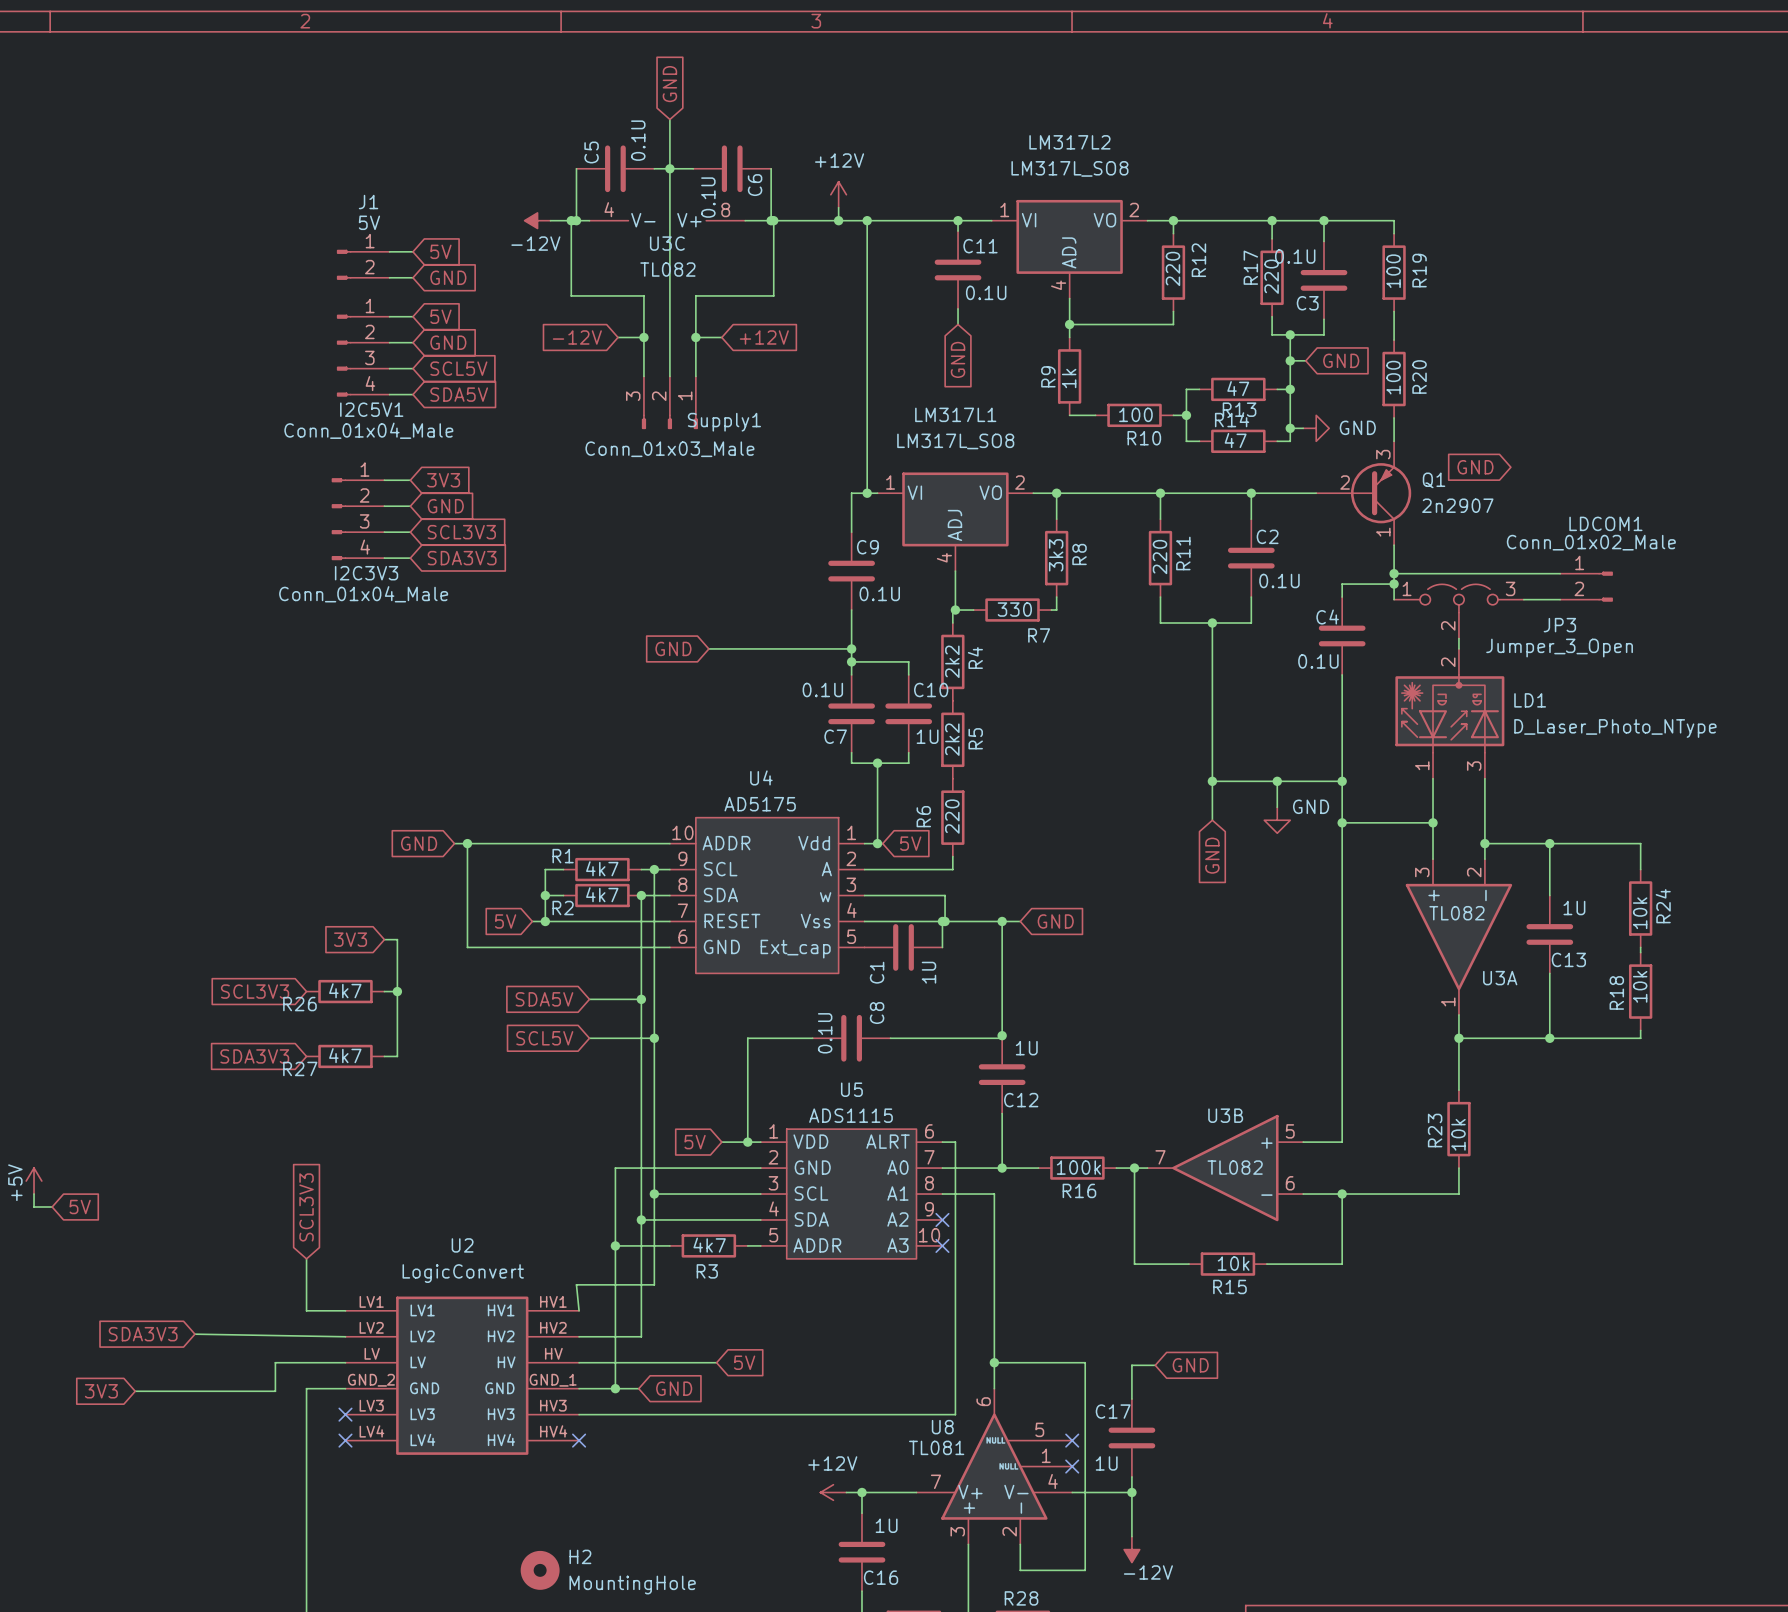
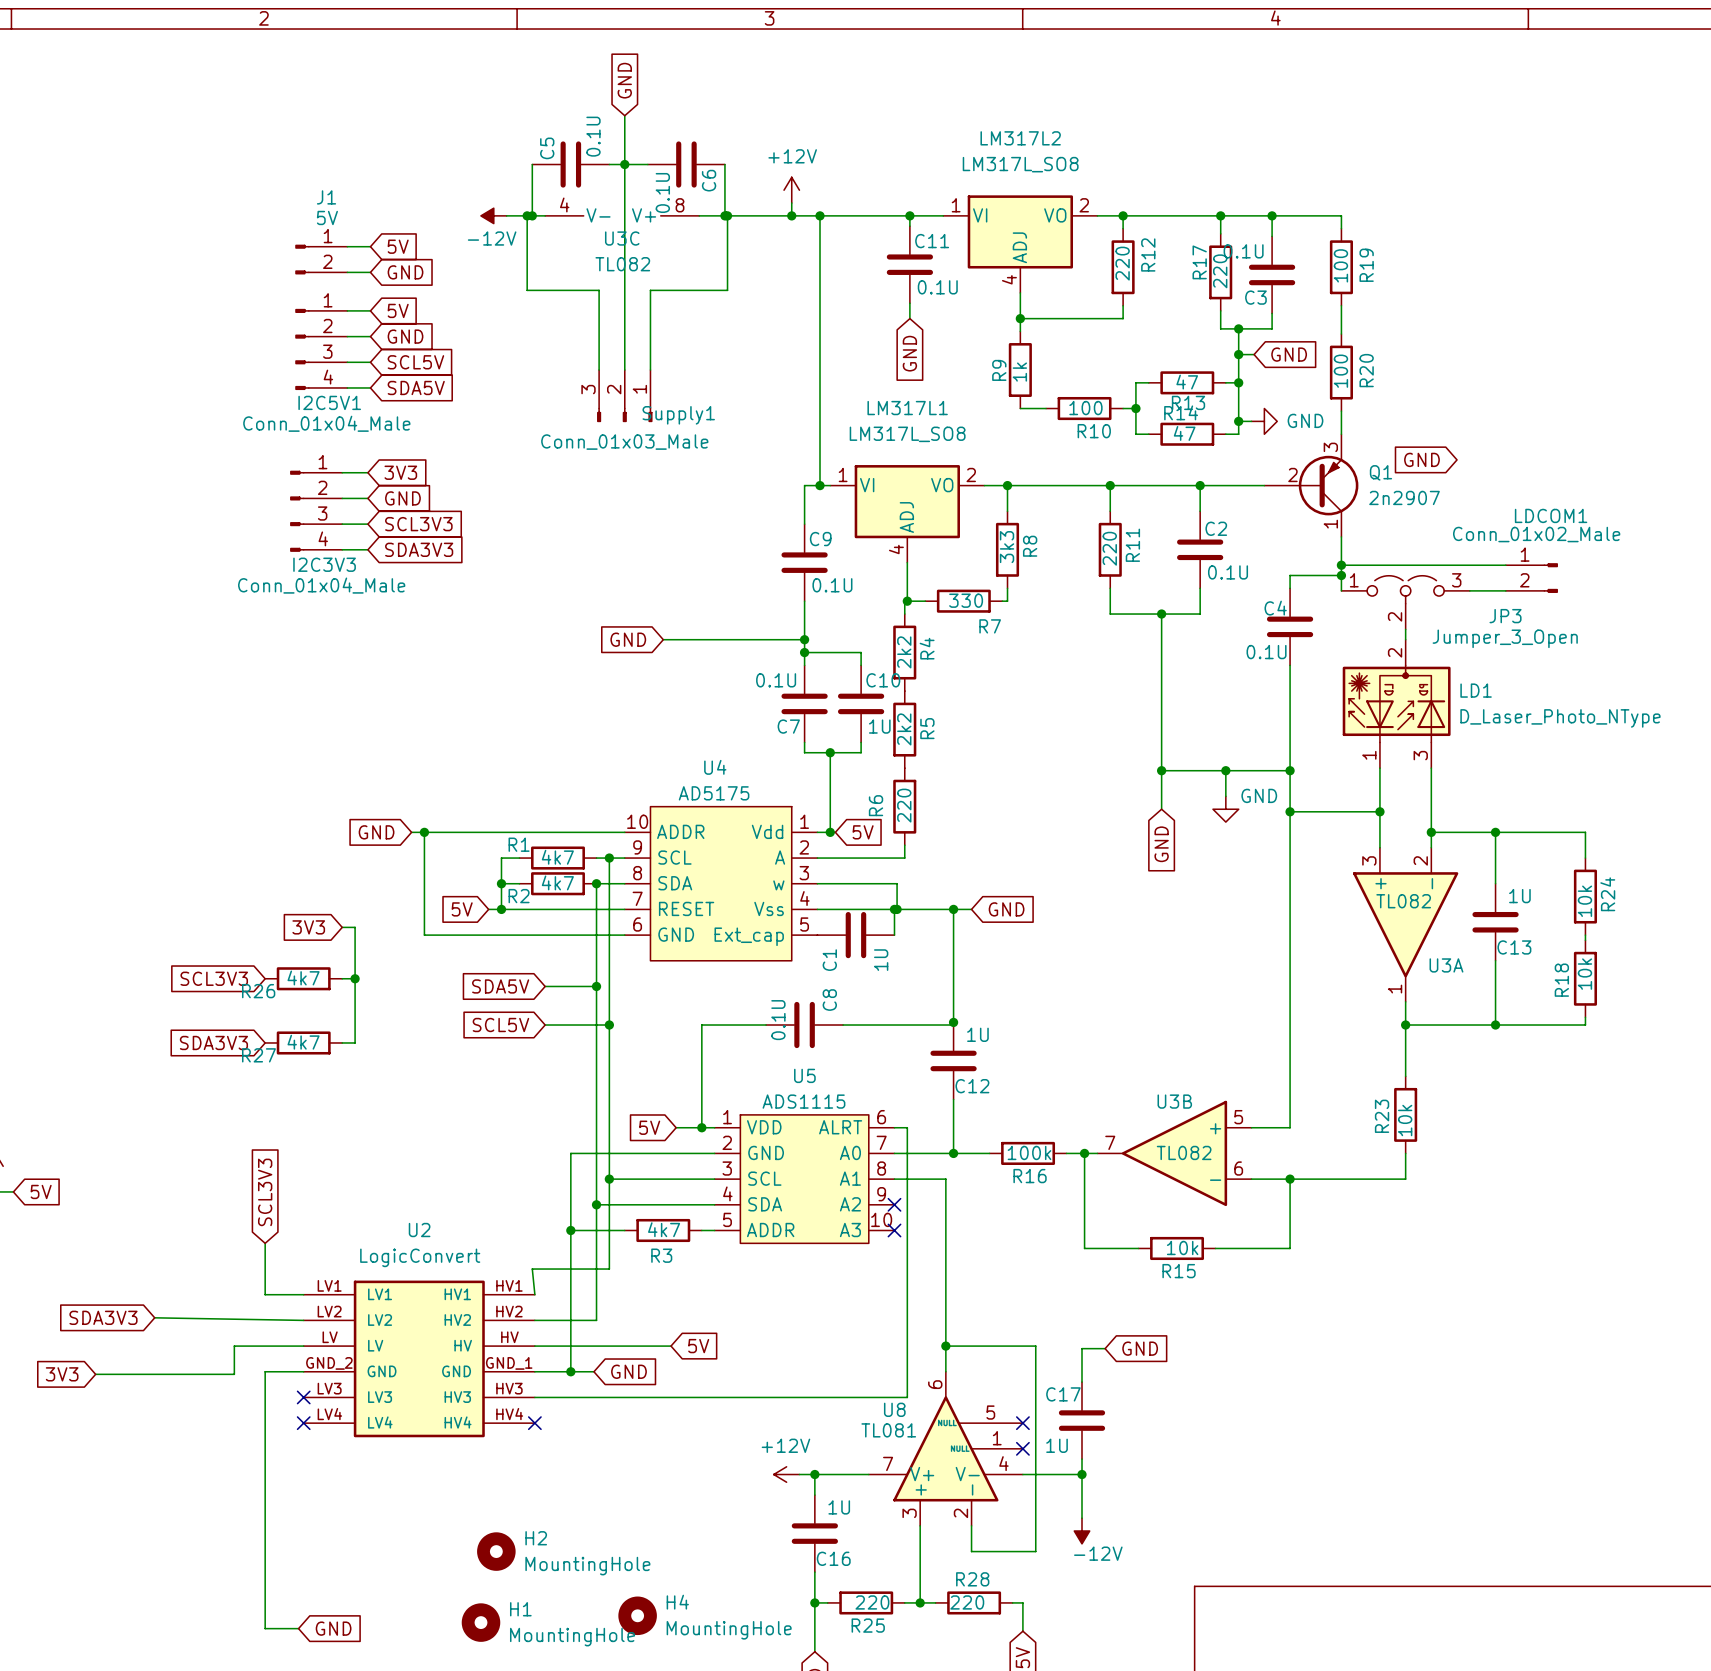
global label: -12V (577, 337) -> none
wire: (618, 337) (643, 337) -> none
junction: (643, 337) -> none
wire: (695, 337) (721, 337) -> none
junction: (695, 337) -> none
global label: +12V (764, 337) -> none

